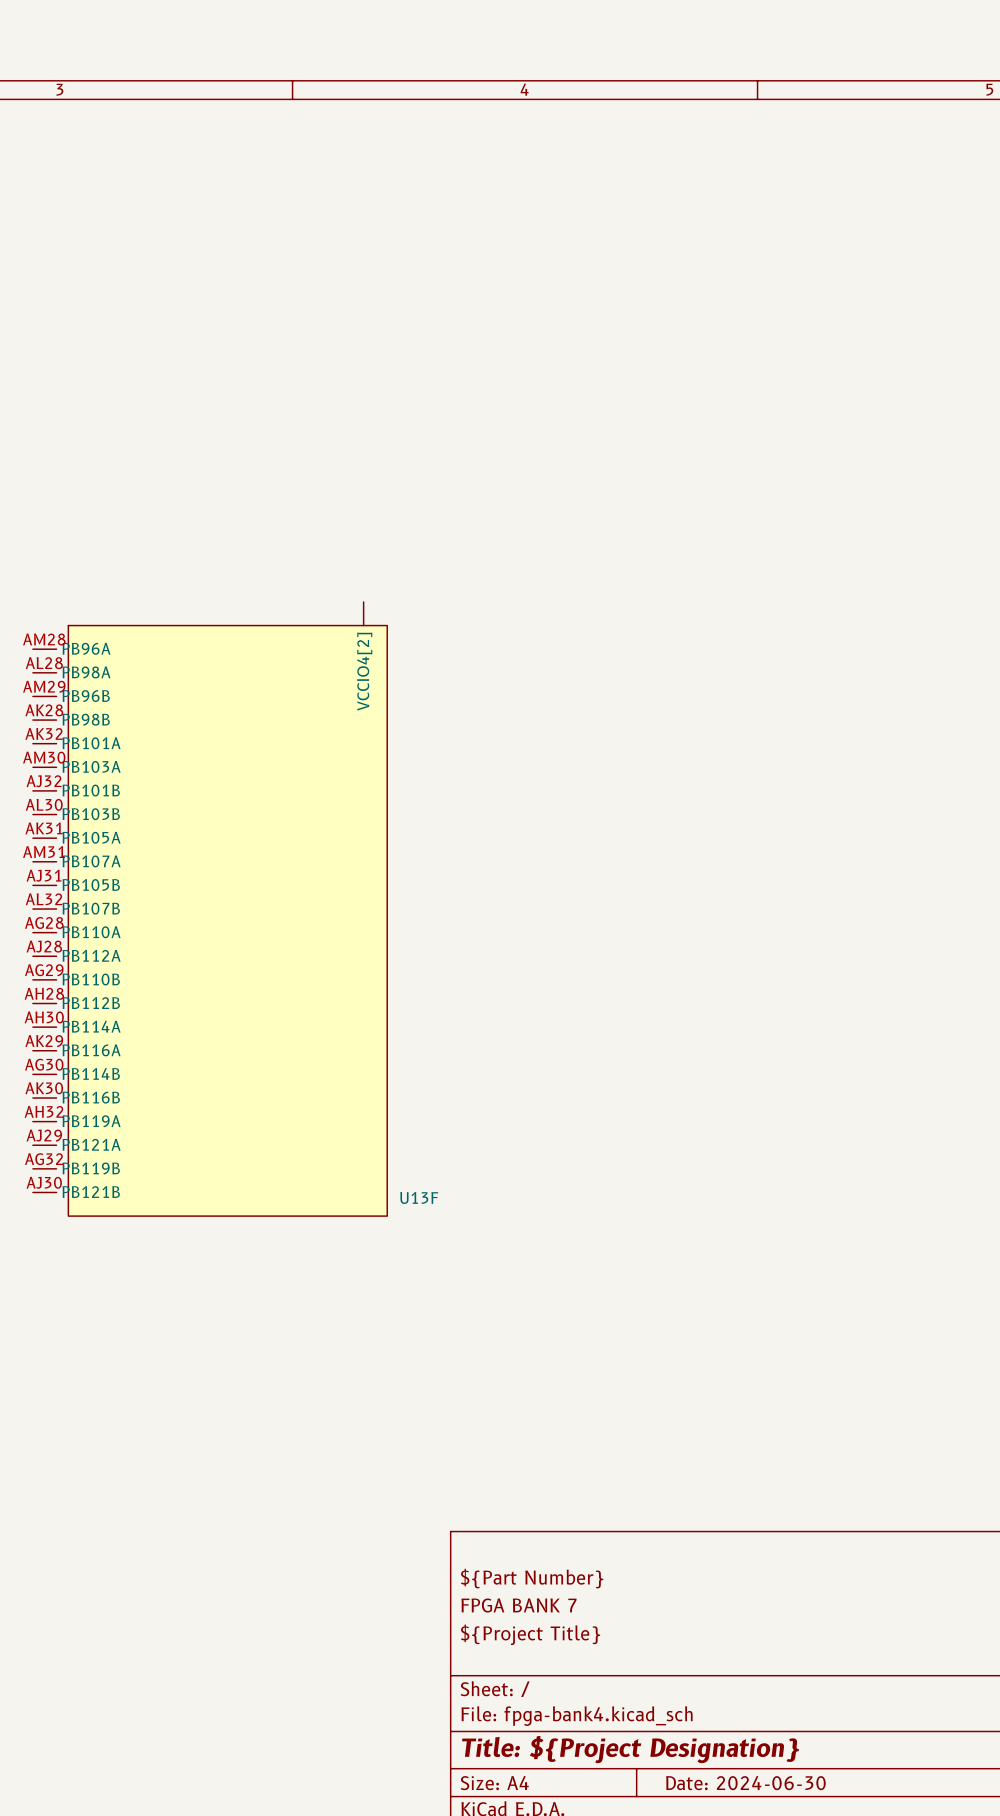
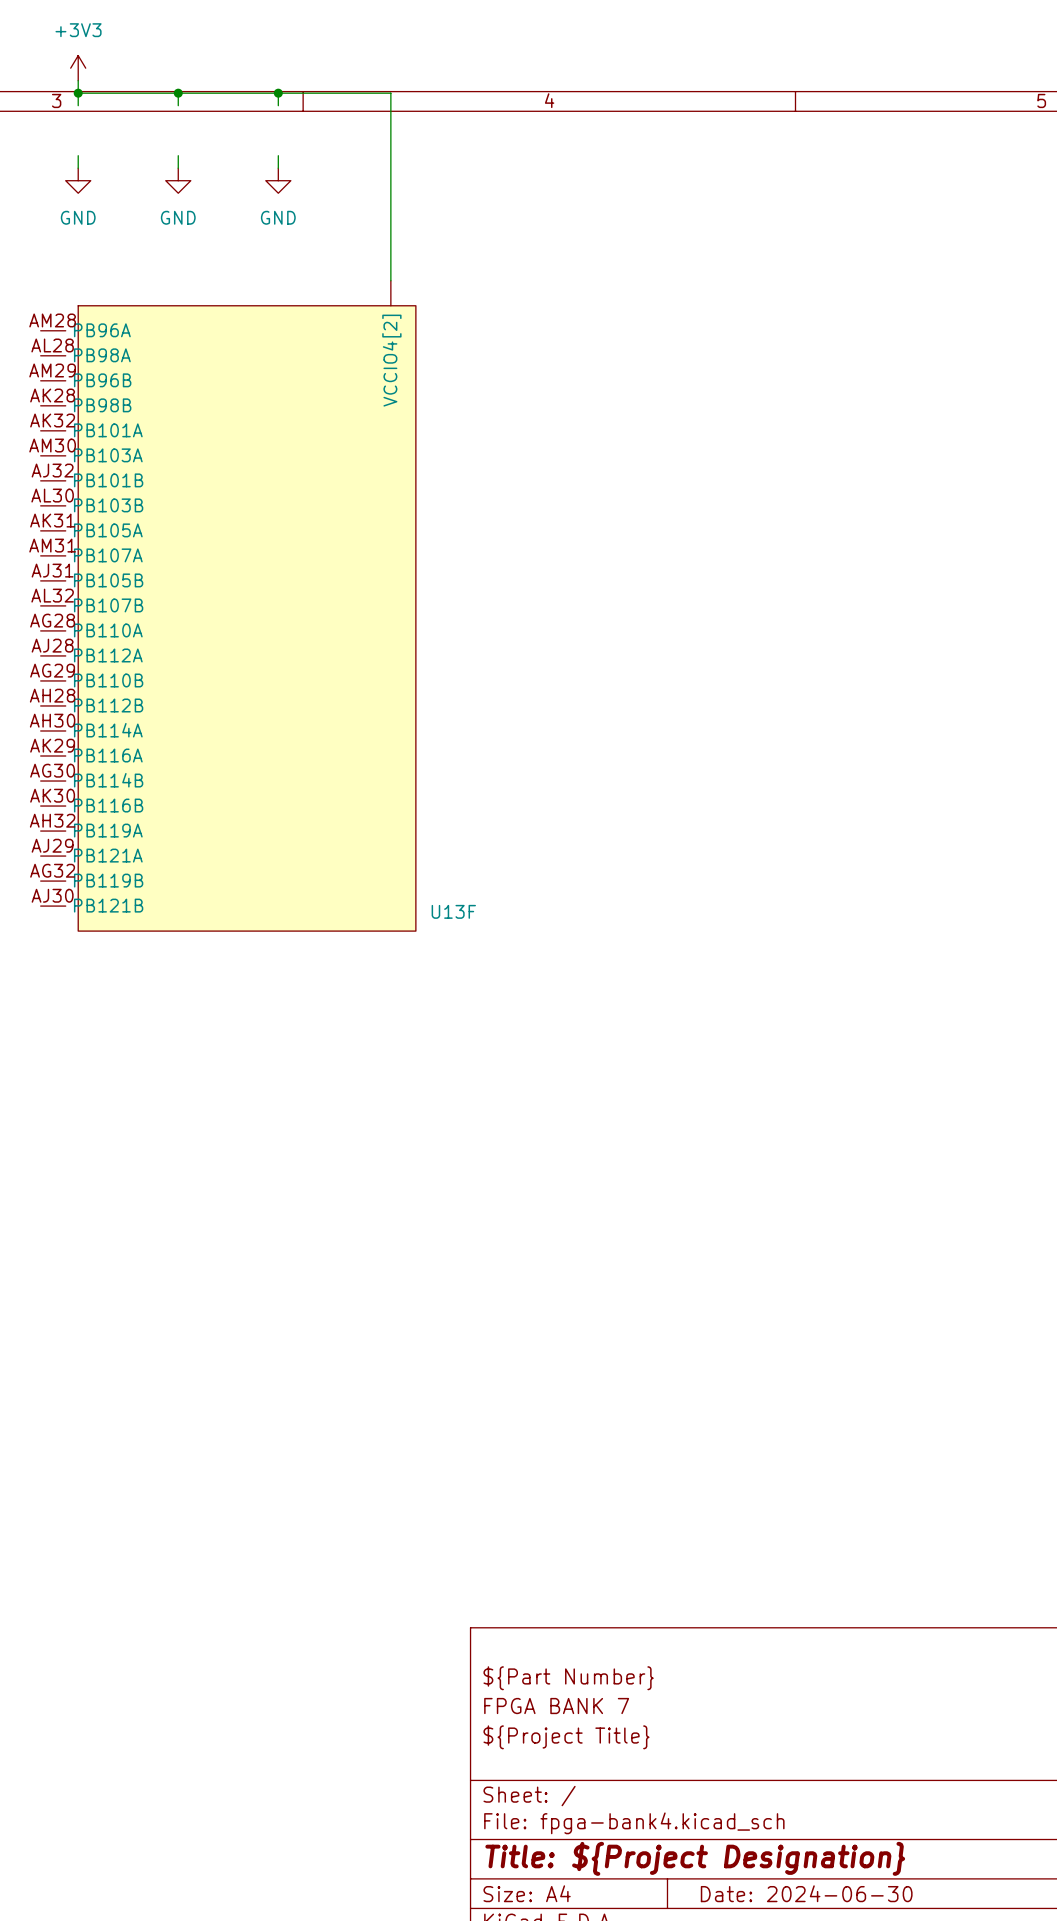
power symbol: none -> +3V3 (78, 68)
wire: none -> (78, 80) (78, 105)
wire: none -> (78, 93) (390, 93) (390, 280)
junction: none -> (78, 93)
wire: none -> (178, 93) (178, 105)
junction: none -> (178, 93)
wire: none -> (278, 93) (278, 105)
junction: none -> (278, 93)
wire: none -> (78, 155) (78, 168)
wire: none -> (178, 155) (178, 168)
wire: none -> (278, 155) (278, 168)
power symbol: none -> GND (78, 180)
power symbol: none -> GND (178, 180)
power symbol: none -> GND (278, 180)
U13F position: (210, 909) -> (228, 605)

